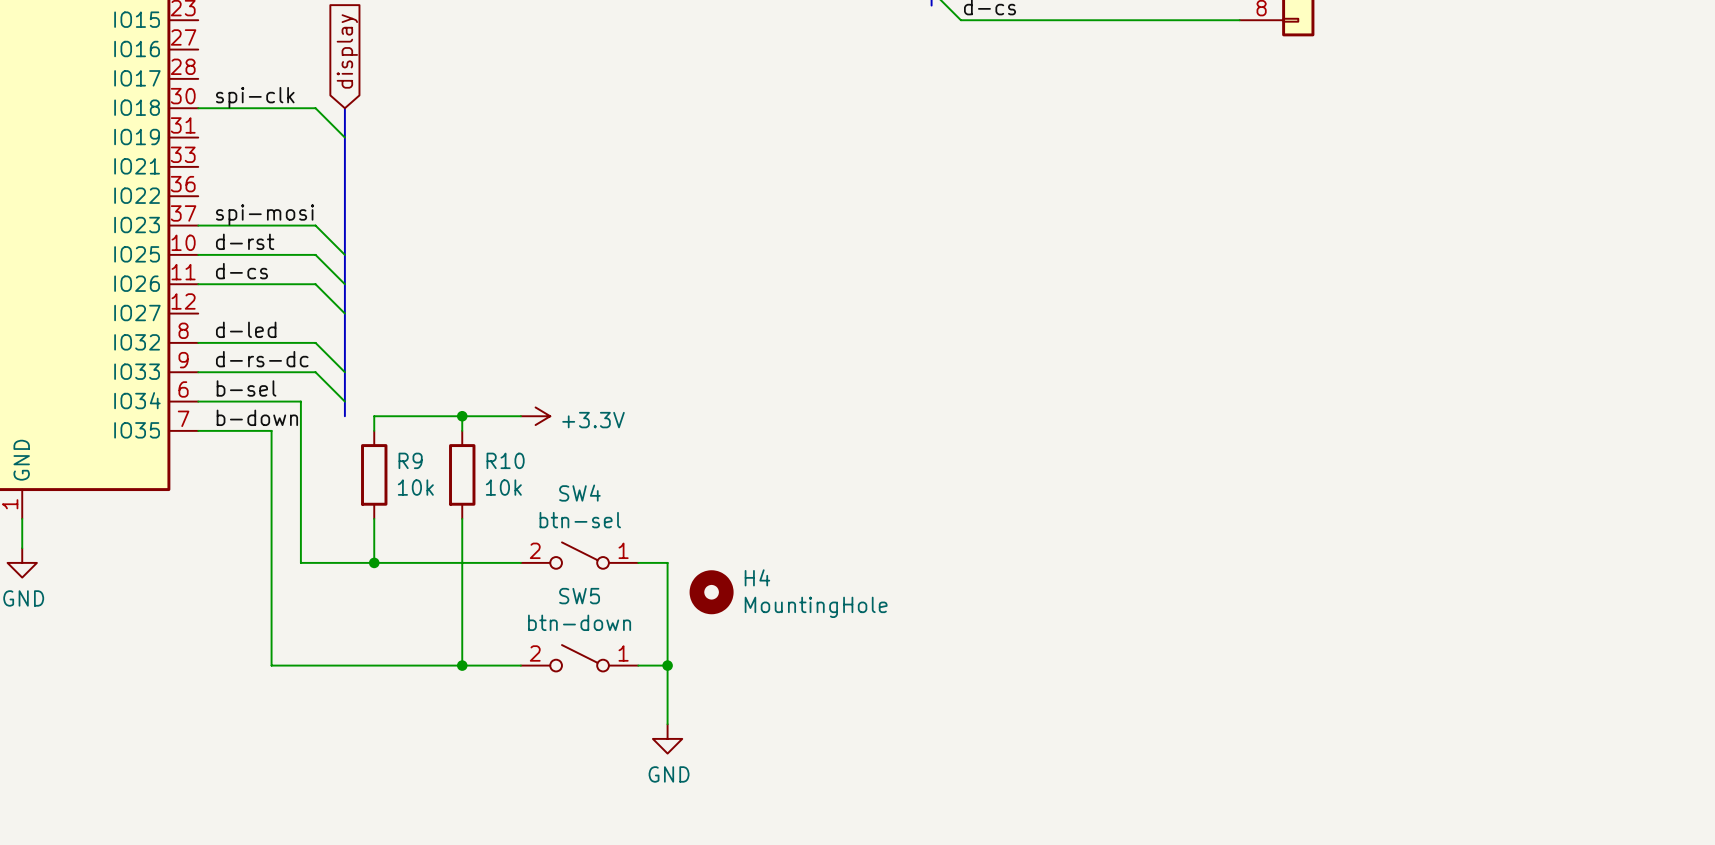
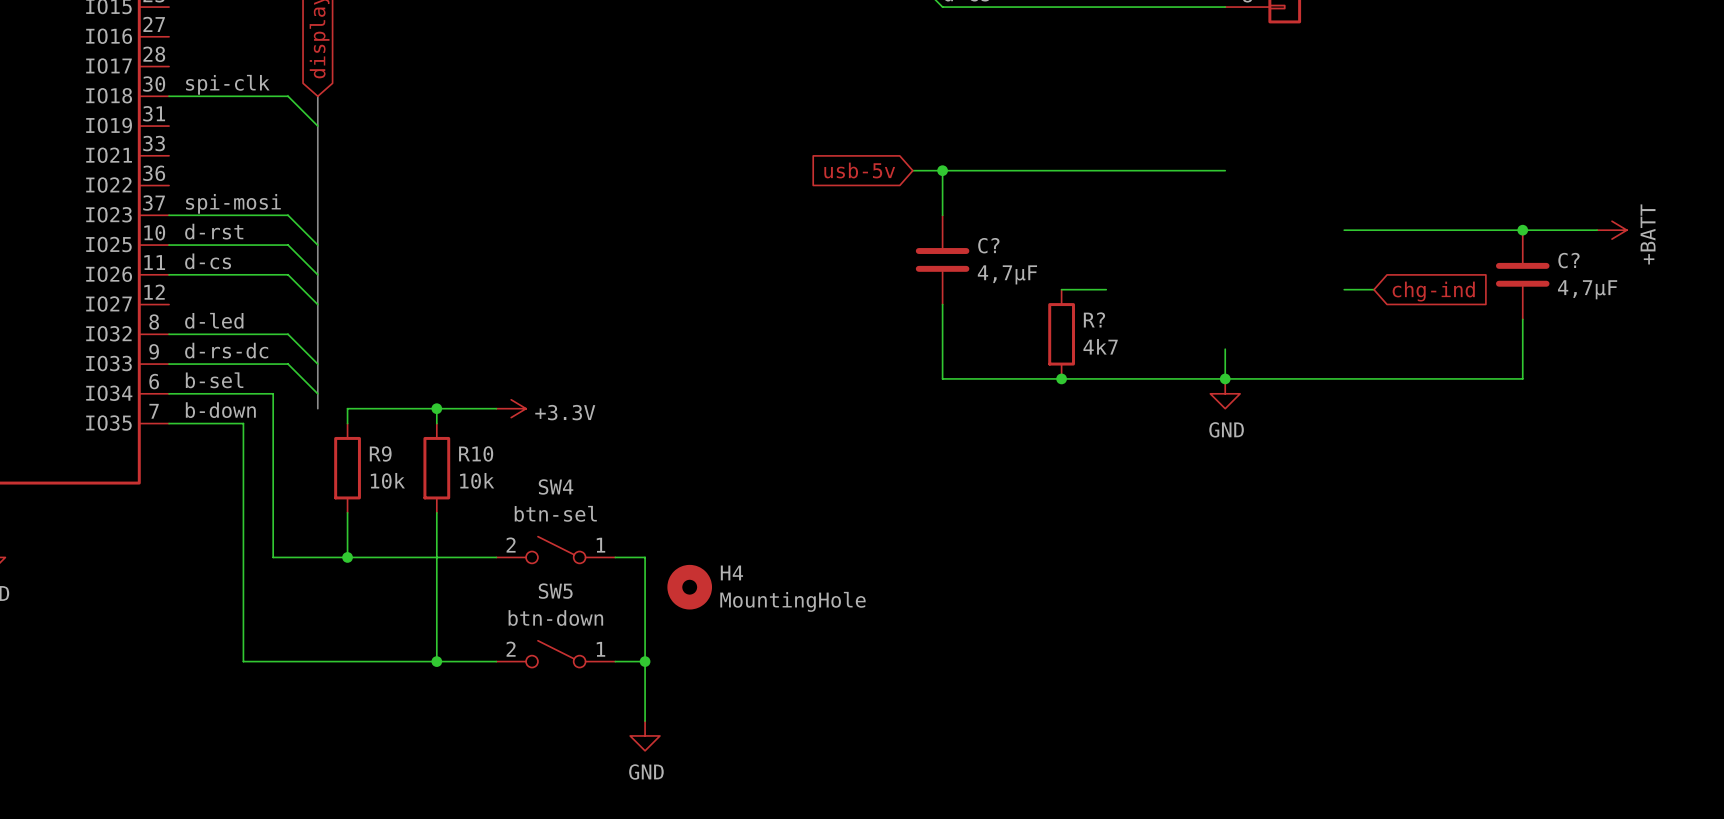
global label: none -> usb-5v (859, 170)
wire: none -> (912, 170) (1225, 170)
wire: none -> (942, 170) (942, 215)
junction: none -> (942, 170)
wire: none -> (1344, 230) (1597, 230)
junction: none -> (1522, 230)
power symbol: none -> +BATT (1612, 230)
C?: none -> 4,7μF (942, 259)
C?: none -> 4,7μF (1522, 274)
wire: none -> (1061, 289) (1106, 289)
wire: none -> (1344, 289) (1373, 289)
global label: none -> chg-ind (1433, 291)
wire: none -> (942, 304) (942, 378) (1522, 378) (1522, 319)
R?: none -> 4k7 (1061, 334)
wire: none -> (1225, 349) (1225, 378)
junction: none -> (1061, 378)
junction: none -> (1225, 378)
power symbol: none -> GND (1225, 393)

